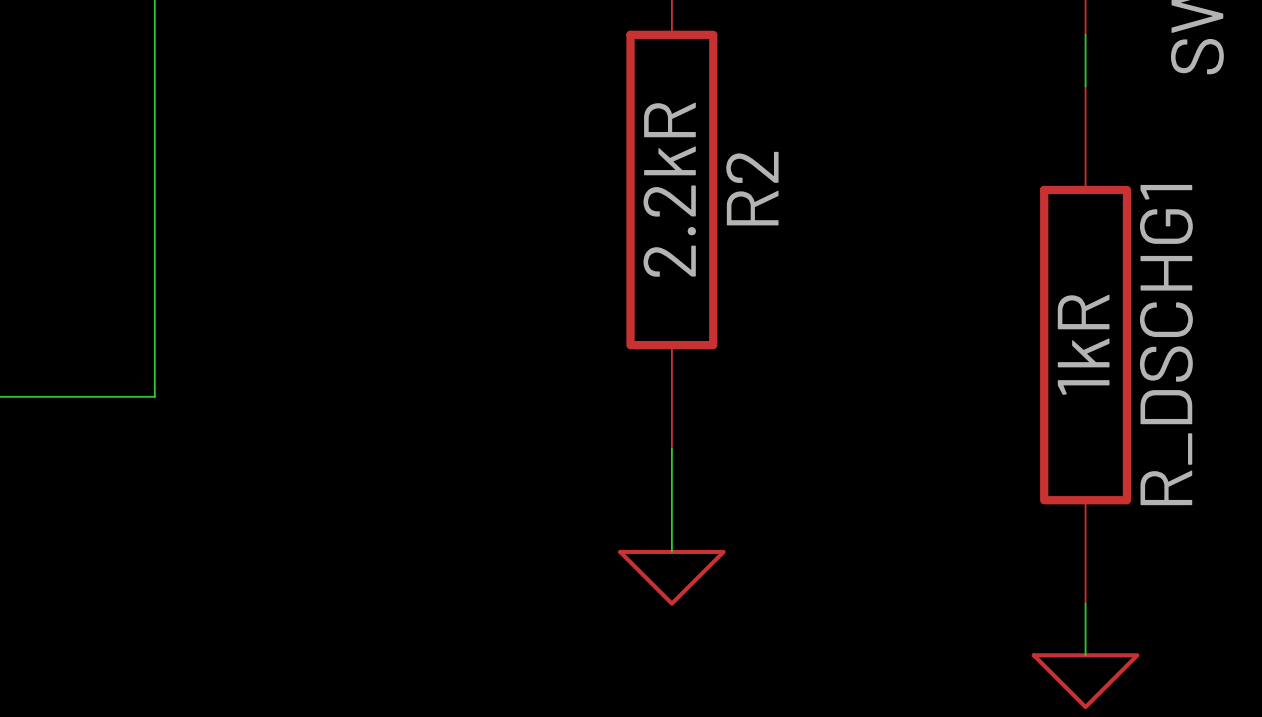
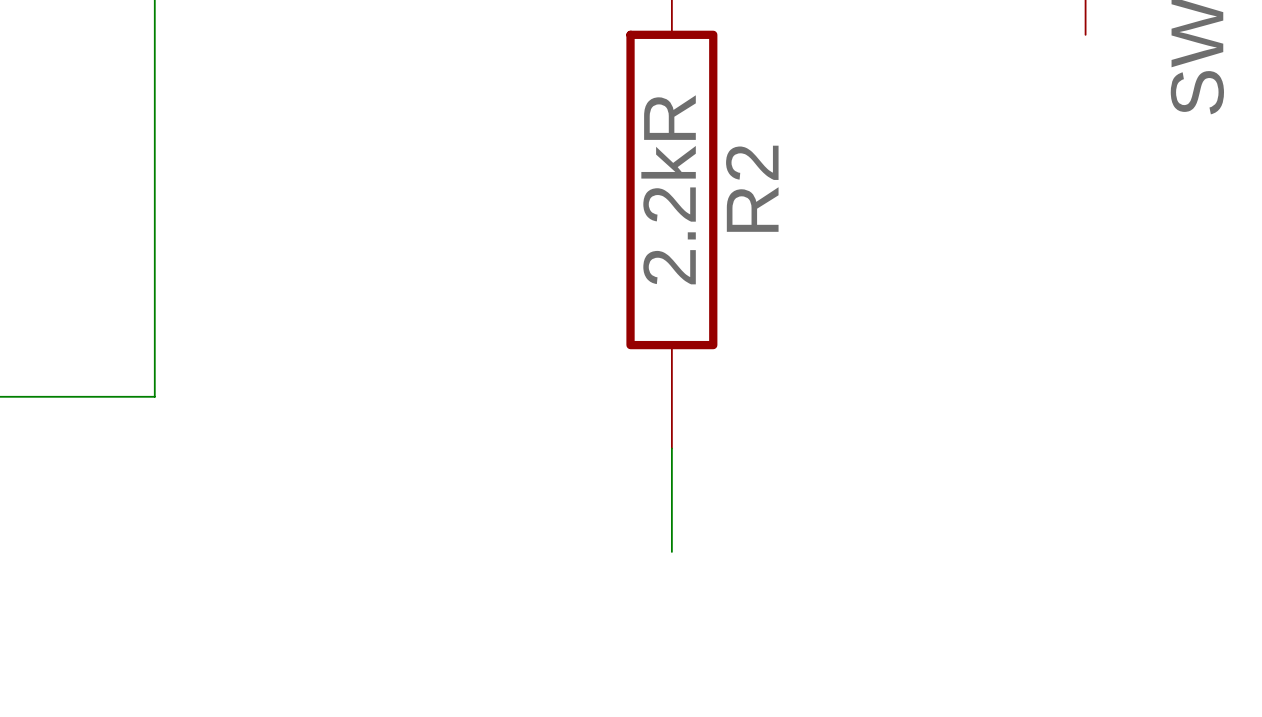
wire: (1085, 34) (1085, 86) -> none
R_DSCHG1: 1kR (1085, 345) -> none
power symbol: (671, 577) -> none
wire: (1085, 603) (1085, 655) -> none
power symbol: (1085, 681) -> none

